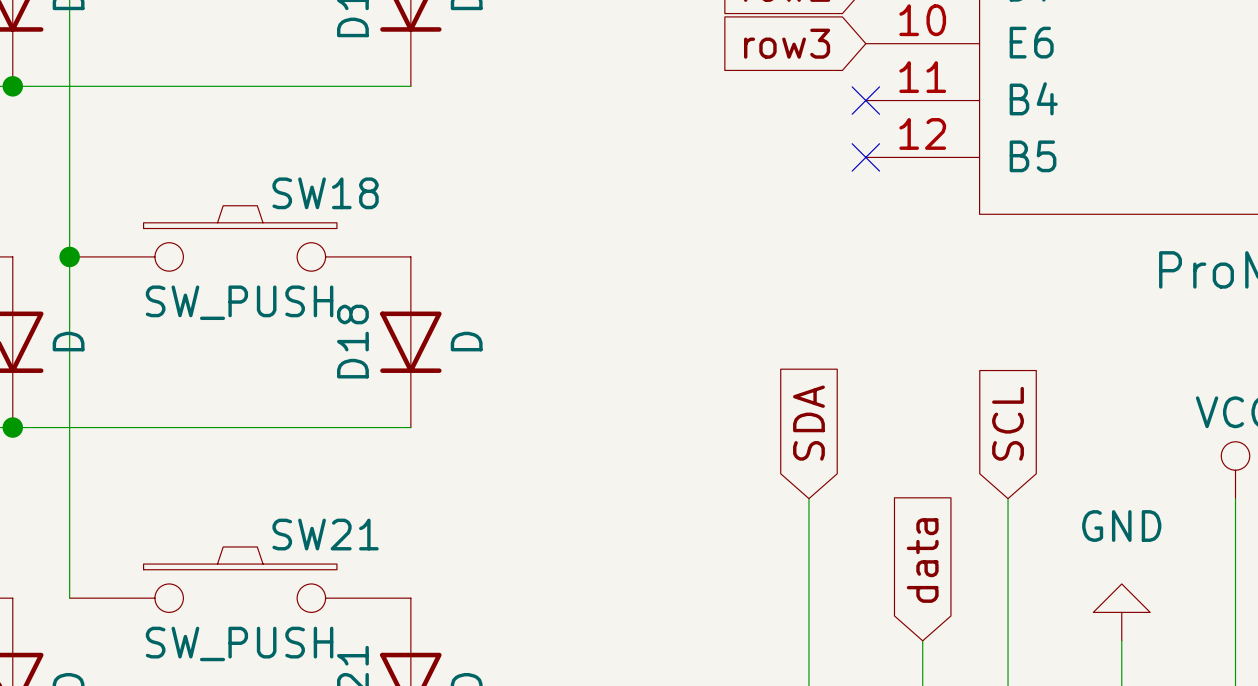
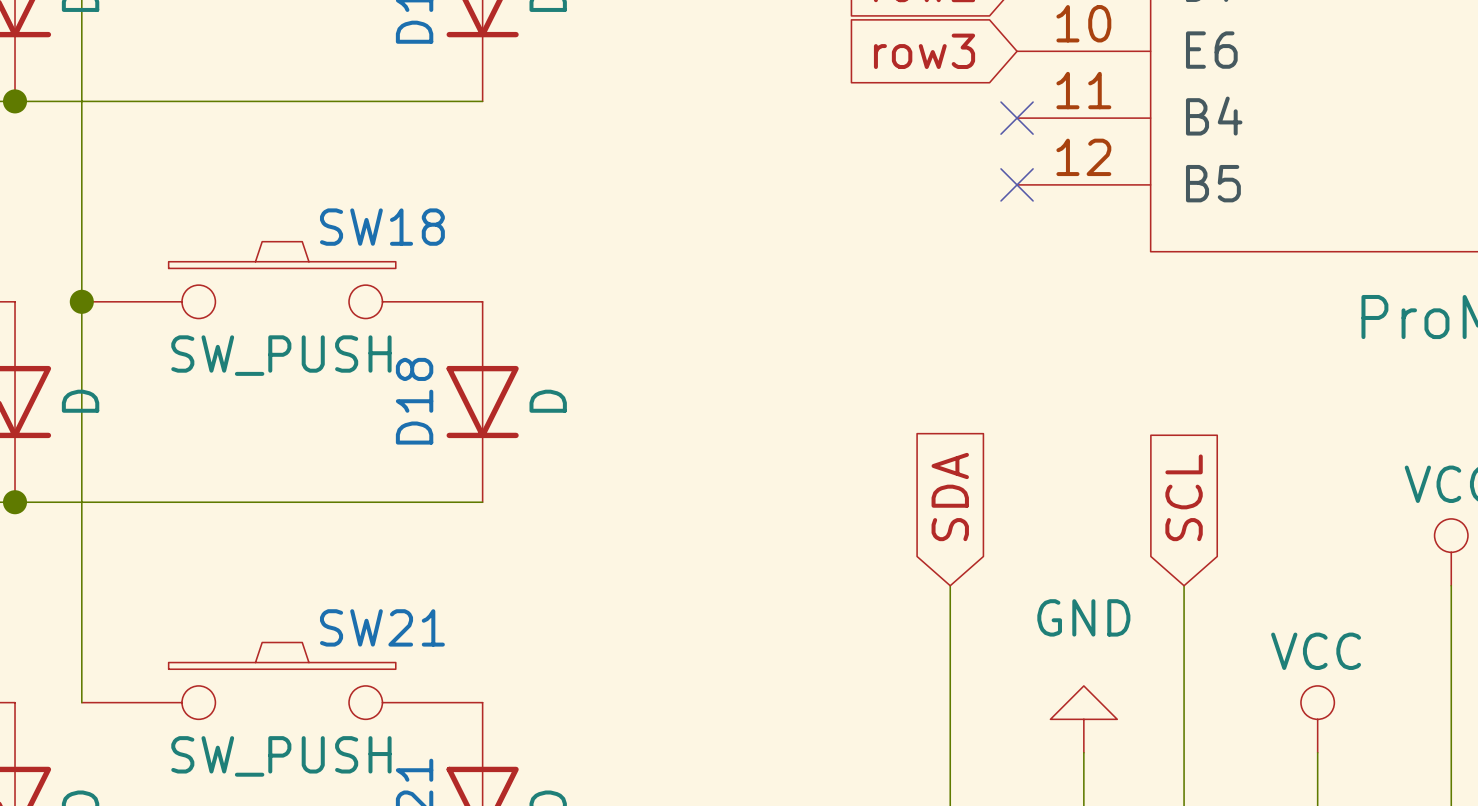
global label: data (922, 560) -> none
power symbol: none -> GND (1083, 719)
power symbol: GND (1121, 612) -> VCC (1317, 719)

